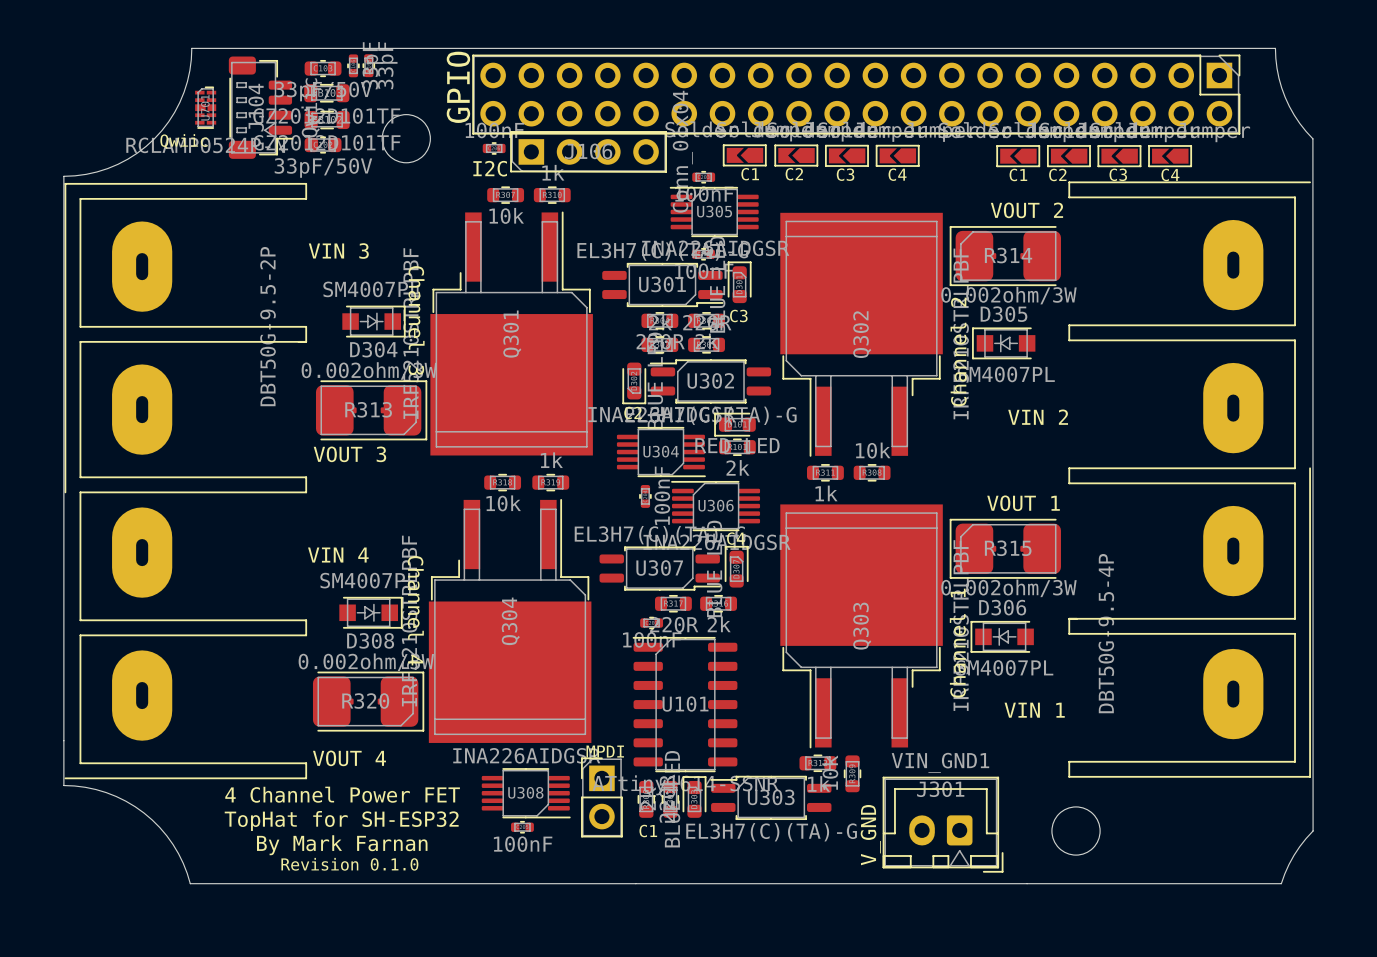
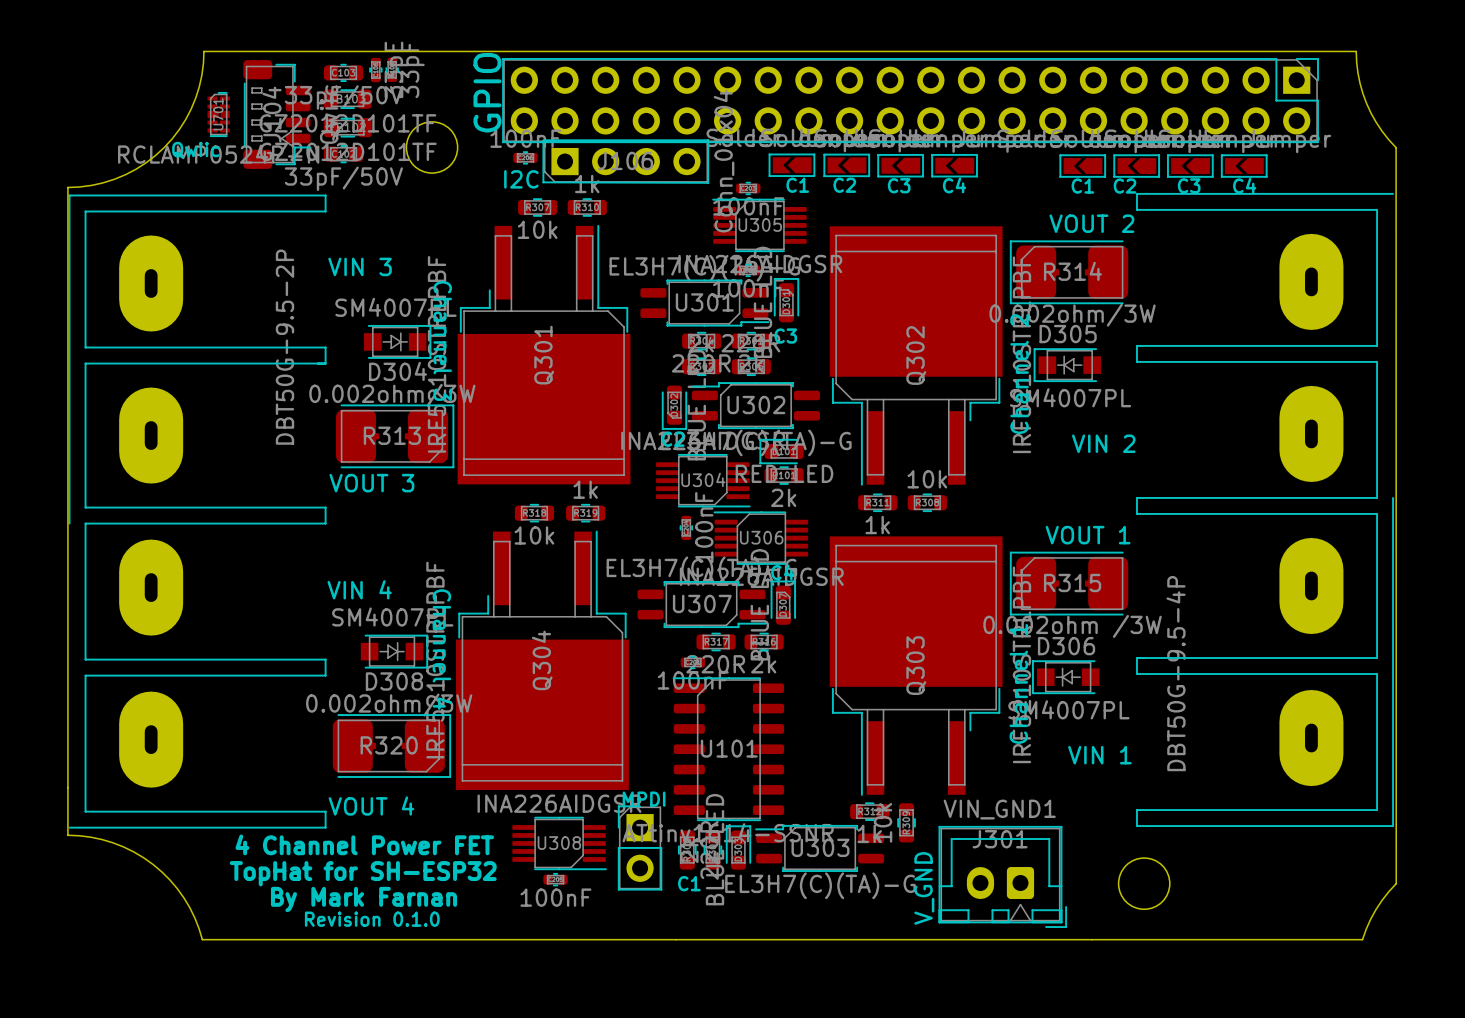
R315 value: 0.002ohm/3W (1008, 588) -> 0.002ohm /3W (1072, 626)

